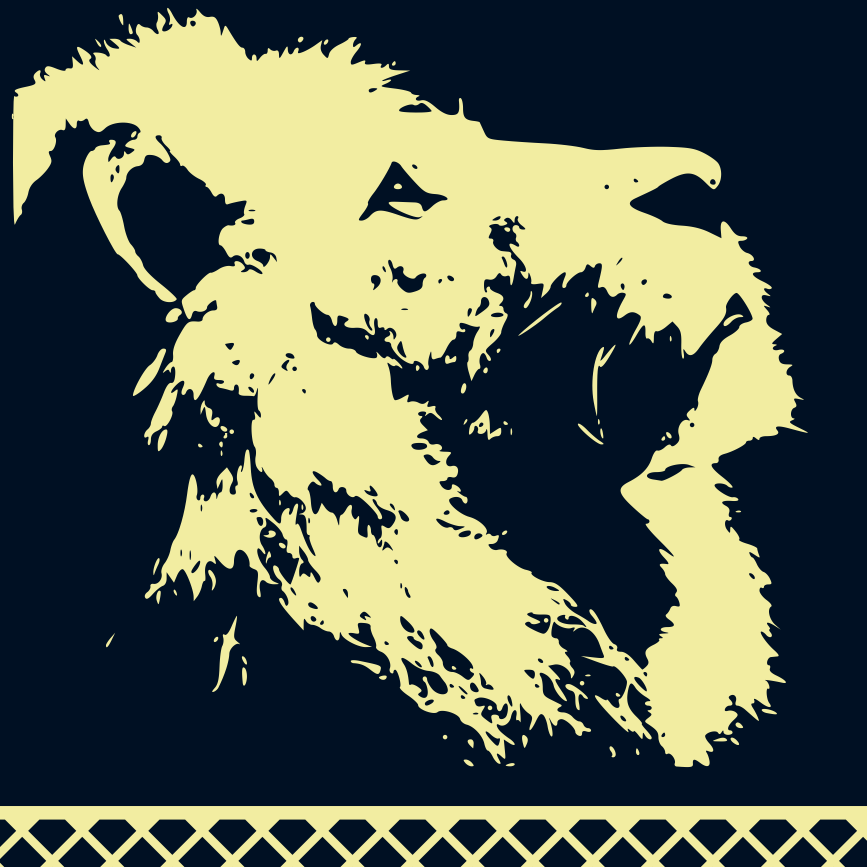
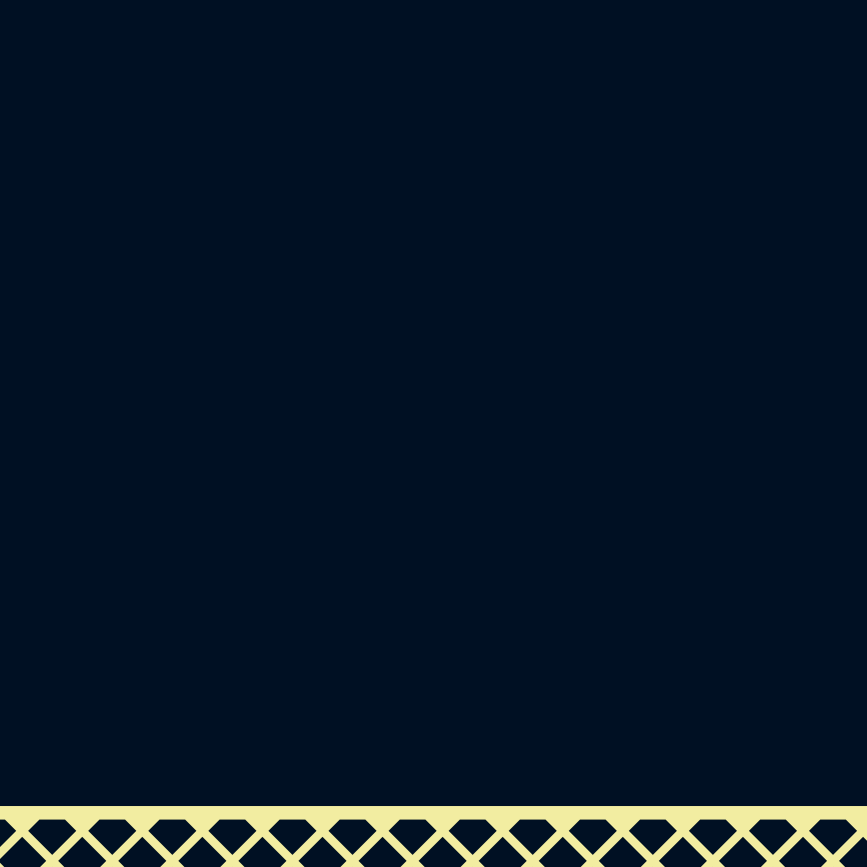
drawing: [11, 7, 808, 768] -> none

